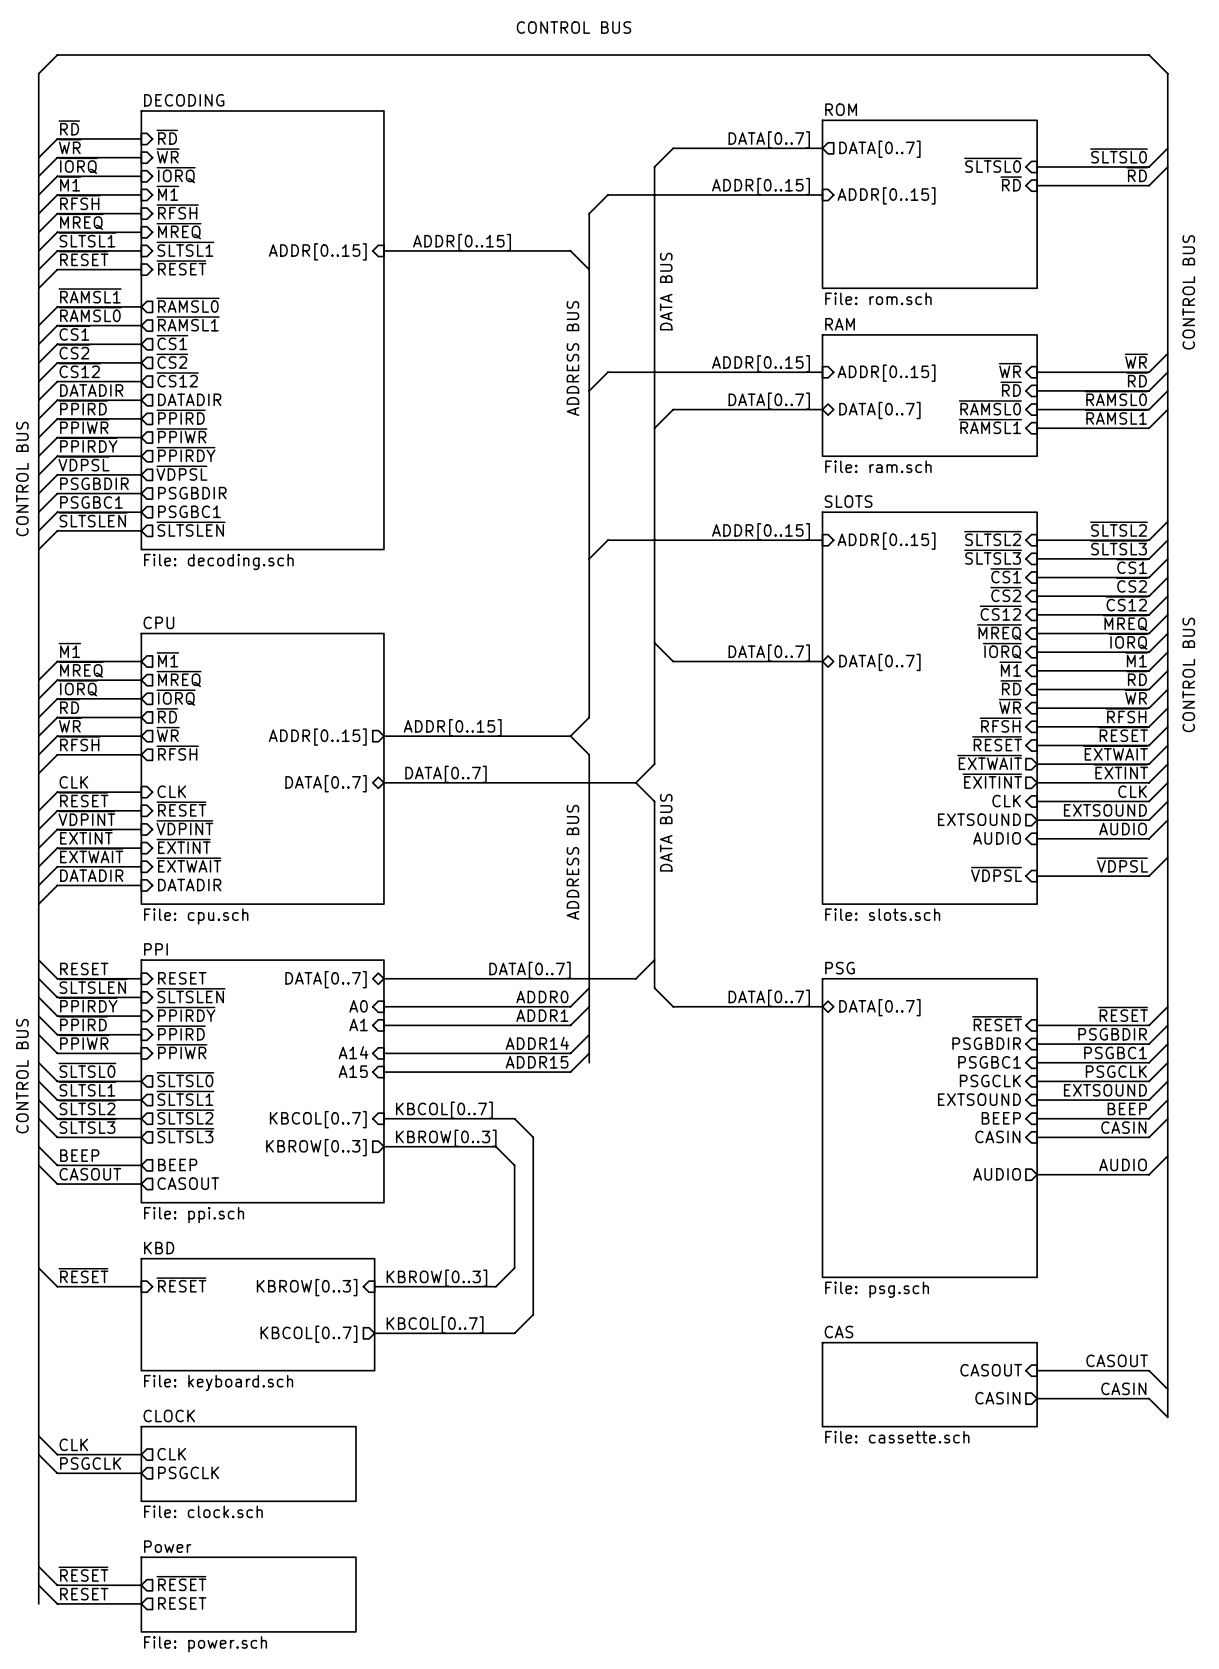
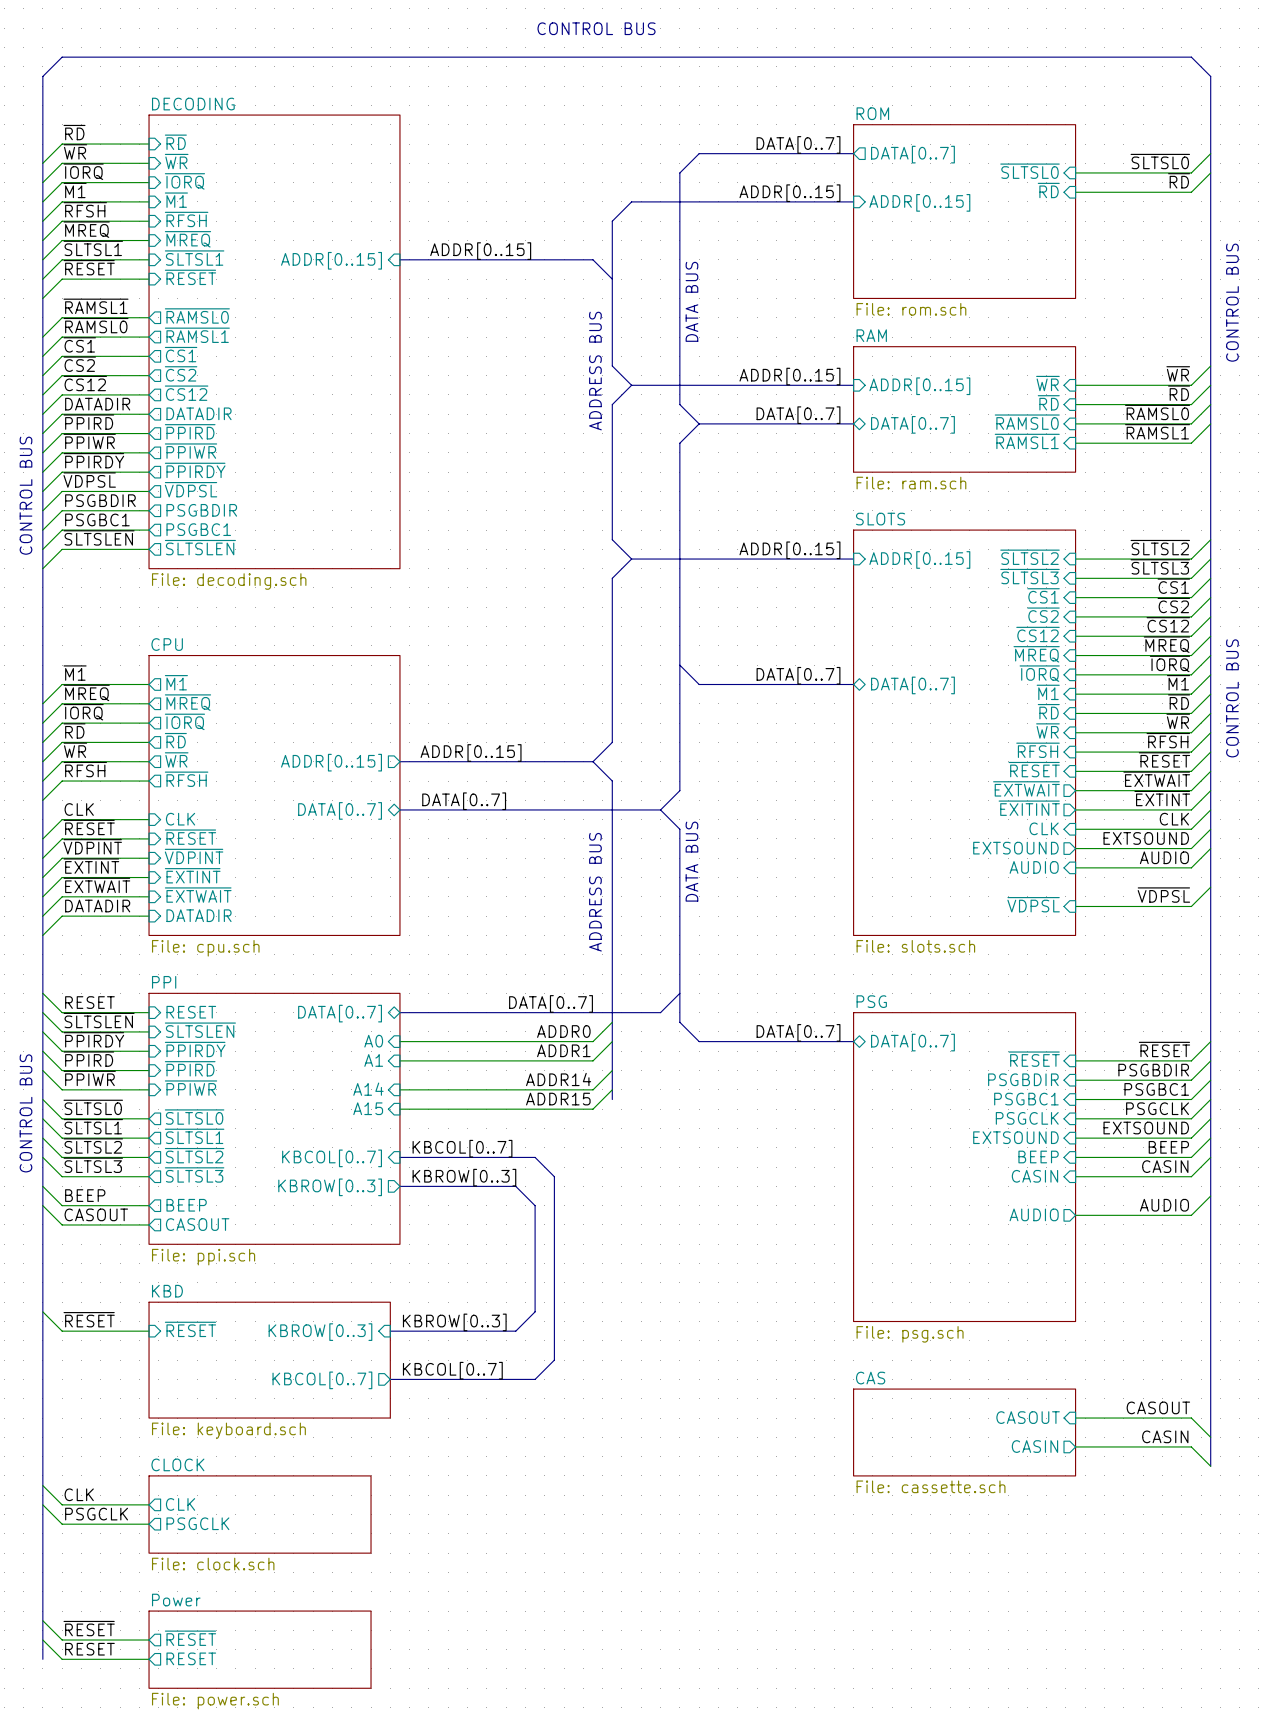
bus: (589, 353) (589, 390) -> (612, 365) (631, 385)
bus: (654, 390) (654, 428) -> (679, 404) (699, 423)
bus: (589, 521) (589, 558) -> (612, 539) (631, 559)

